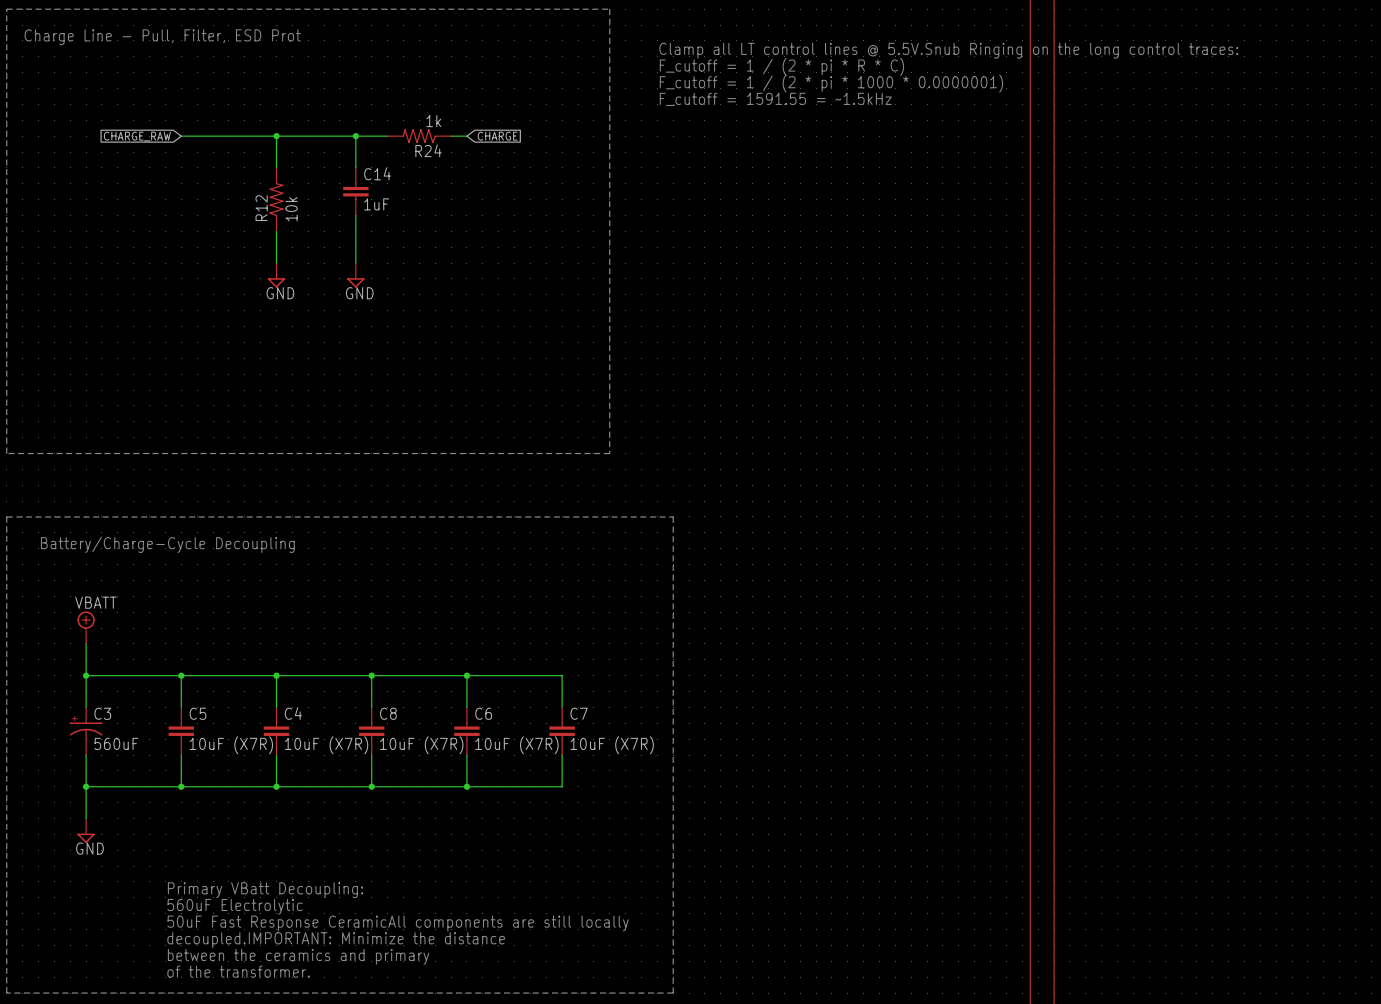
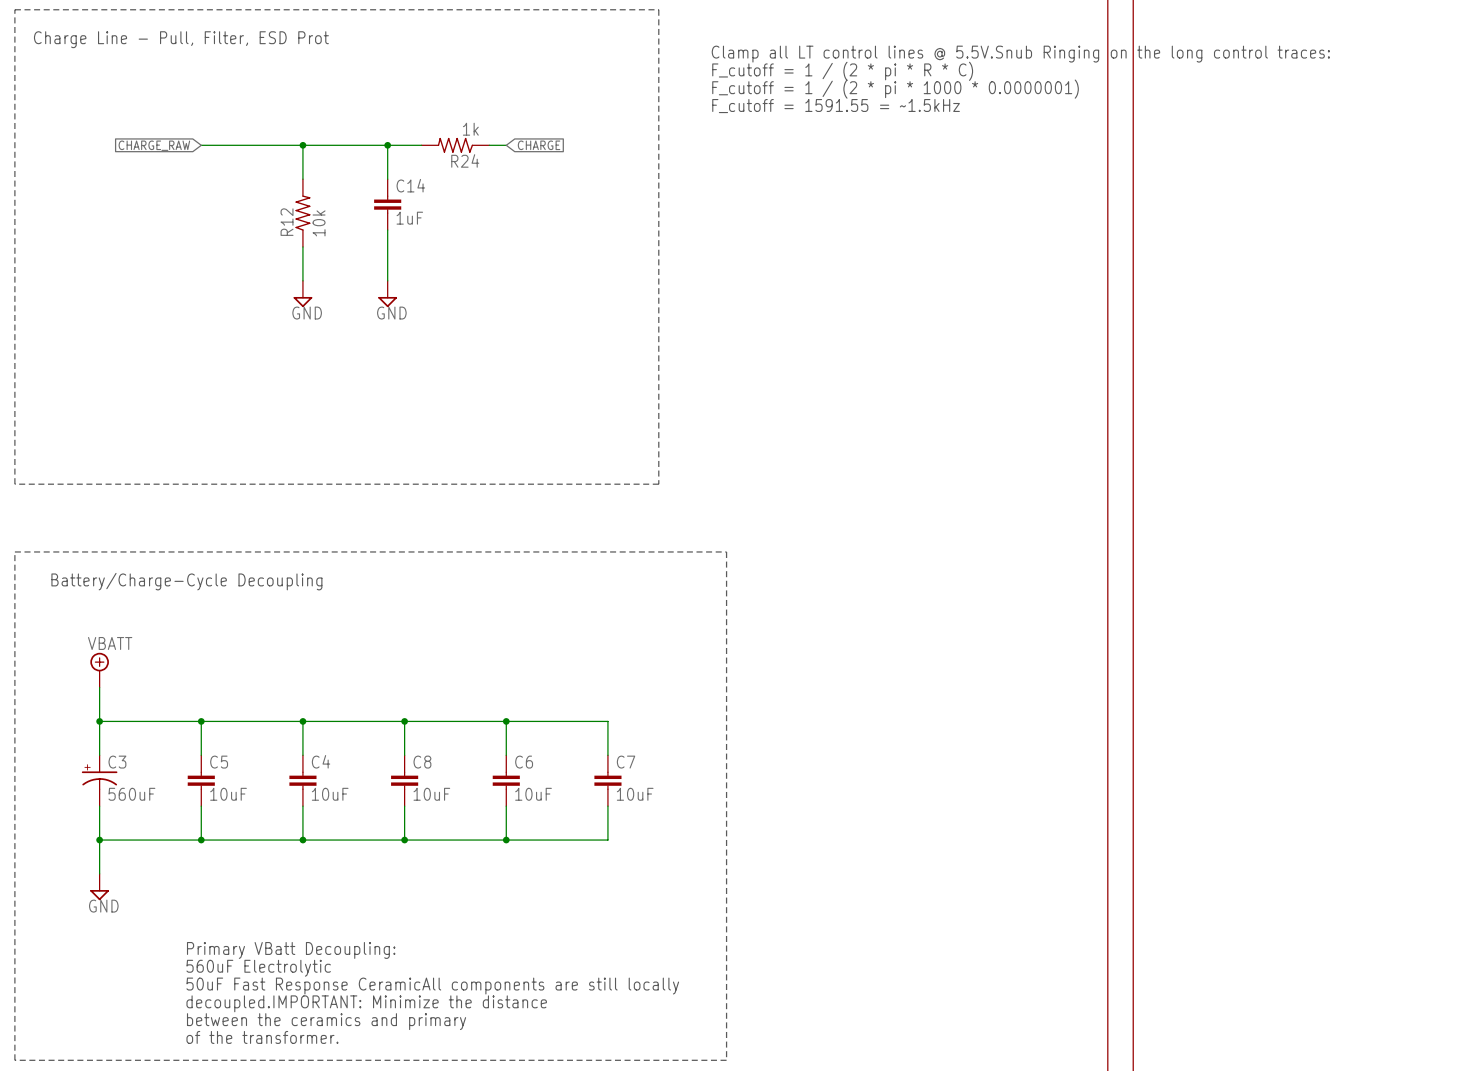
C5 value: 10uF (X7R) (231, 745) -> 10uF (228, 794)
C4 value: 10uF (X7R) (326, 745) -> 10uF (330, 794)
C8 value: 10uF (X7R) (421, 745) -> 10uF (431, 794)
C6 value: 10uF (X7R) (516, 745) -> 10uF (533, 794)
C7 value: 10uF (X7R) (612, 745) -> 10uF (635, 794)

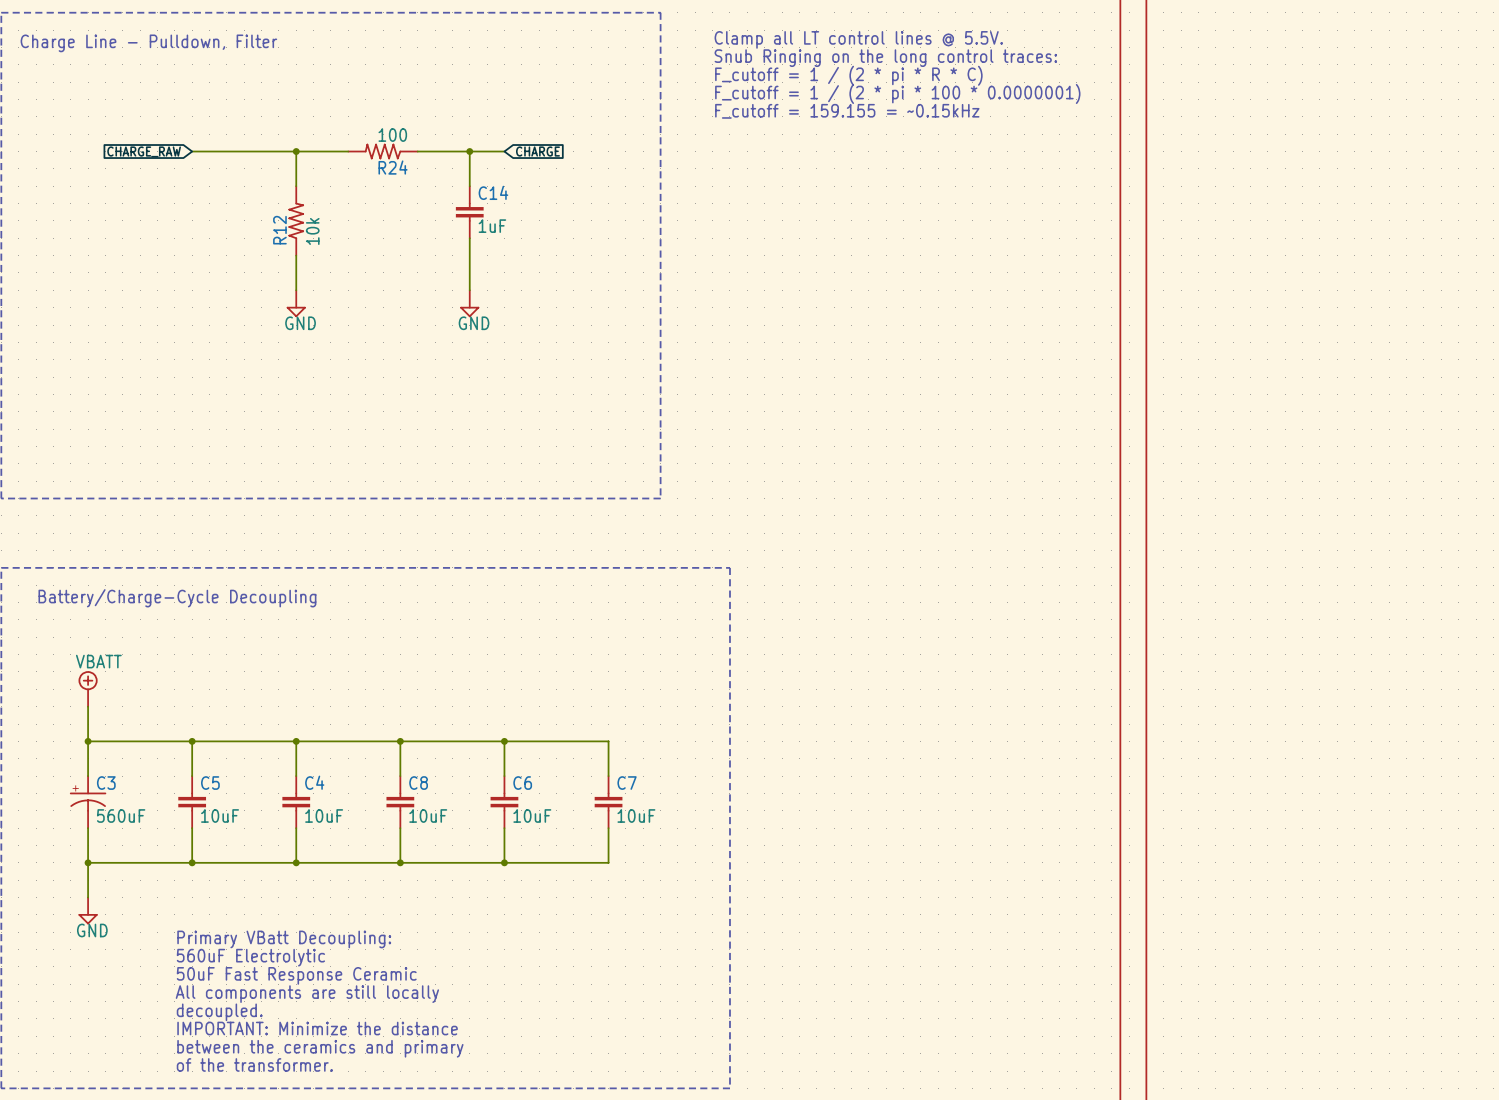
text: none -> Clamp all LT control lines @ 5.5V. (858, 39)
text: Charge Line - Pull, Filter, ESD Prot (181, 39) -> Charge Line - Pulldown, Filter (148, 43)
text: Clamp all LT control lines @ 5.5V.Snub Ringing on the long control traces: (1020, 54) -> Snub Ringing on the long control traces: (885, 58)
text: F_cutoff = 1 / (2 * pi * 1000 * 0.0000001) (895, 89) -> F_cutoff = 1 / (2 * pi * 100 * 0.0000001) (897, 93)
text: F_cutoff = 1591.55 = ~1.5kHz (836, 106) -> F_cutoff = 159.155 = ~0.15kHz (847, 111)
R24 value: 1k (470, 129) -> 100 (392, 135)
wire: (387, 145) (387, 179) -> (469, 151) (469, 186)
junction: (387, 145) -> none
R24 position: (455, 145) -> (383, 151)
junction: none -> (469, 151)
C14 position: (387, 204) -> (469, 212)
wire: (387, 230) (387, 280) -> (469, 238) (469, 290)
power symbol position: GND (387, 294) -> GND (469, 303)
text: none -> Primary VBatt Decoupling: (284, 939)
text: none -> 560uF Electrolytic (250, 957)
text: Primary VBatt Decoupling: (291, 950) -> 50uF Fast Response Ceramic (296, 975)
text: 560uF Electrolytic (258, 968) -> All components are still locally (307, 994)
text: 50uF Fast Response CeramicAll components are still locally (432, 986) -> decoupled. (219, 1012)
text: decoupled.IMPORTANT: Minimize the distance (366, 1003) -> IMPORTANT: Minimize the distance (317, 1028)

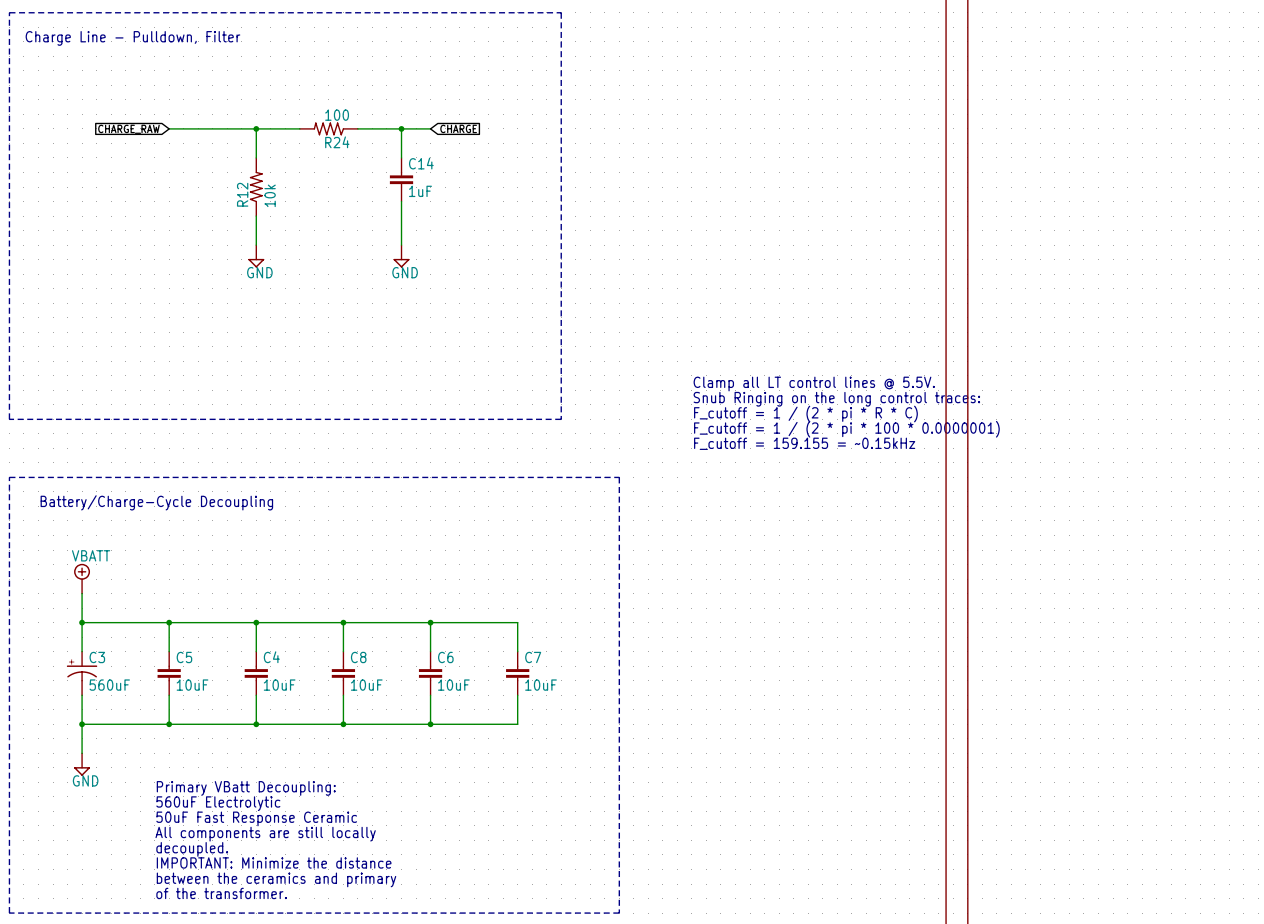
text: Clamp all LT control lines @ 5.5V. (858, 39) -> none
text: Snub Ringing on the long control traces: (885, 58) -> none
text: F_cutoff = 1 / (2 * pi * R * C) (848, 75) -> none
text: F_cutoff = 1 / (2 * pi * 100 * 0.0000001) (897, 93) -> none
text: F_cutoff = 159.155 = ~0.15kHz (847, 111) -> none
text: none -> Clamp all LT control lines @ 5.5V. (814, 384)
text: none -> Snub Ringing on the long control traces: (836, 399)
text: none -> F_cutoff = 1 / (2 * pi * R * C) (805, 414)
text: none -> F_cutoff = 1 / (2 * pi * 100 * 0.0000001) (846, 429)
text: none -> F_cutoff = 159.155 = ~0.15kHz (804, 443)

